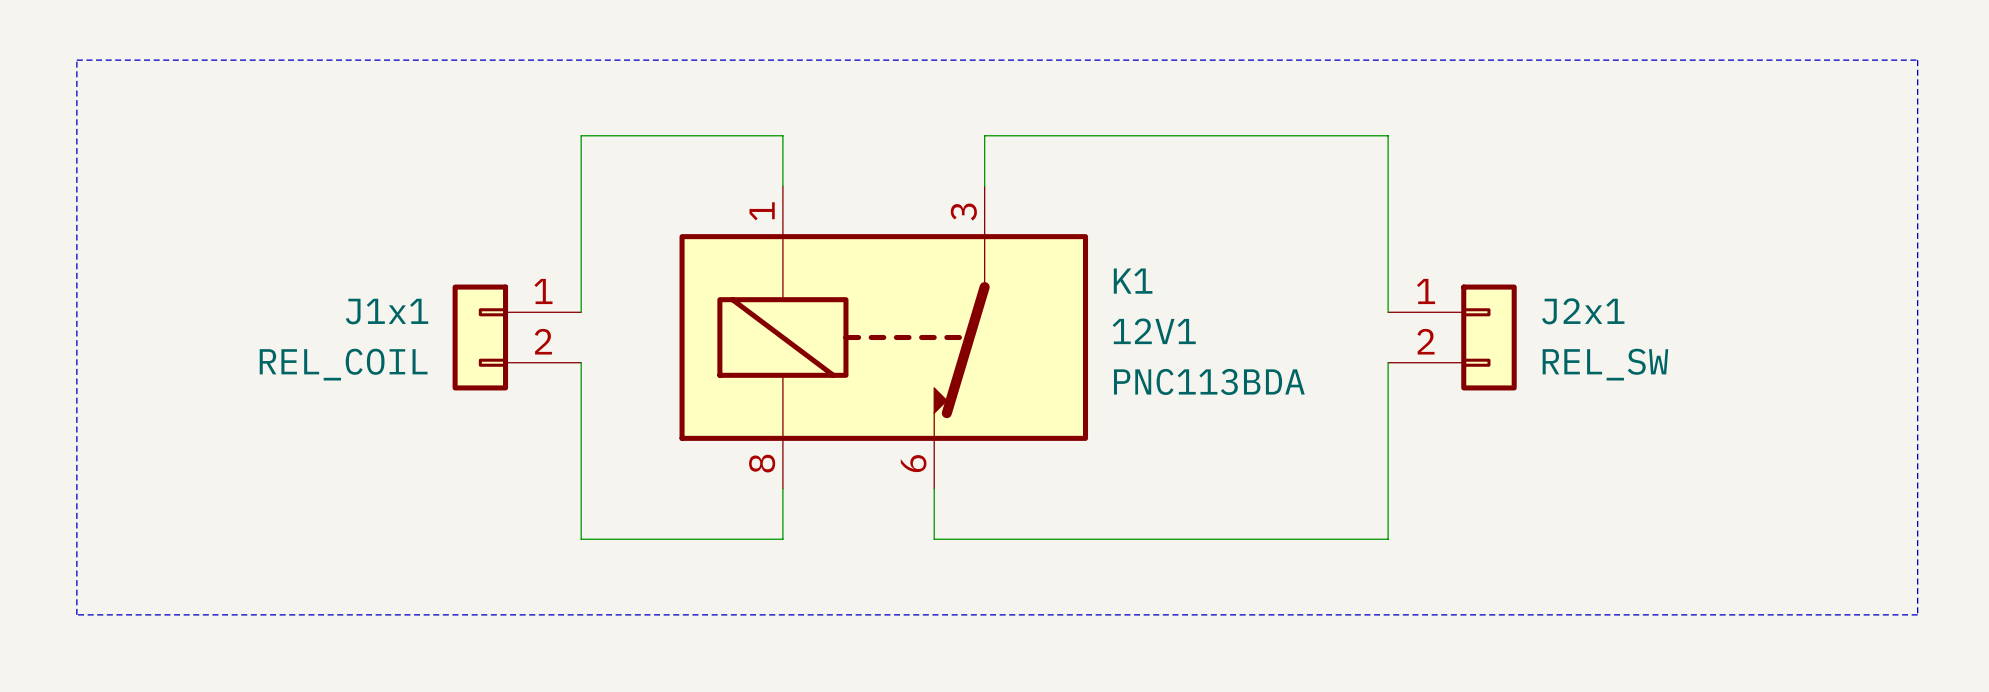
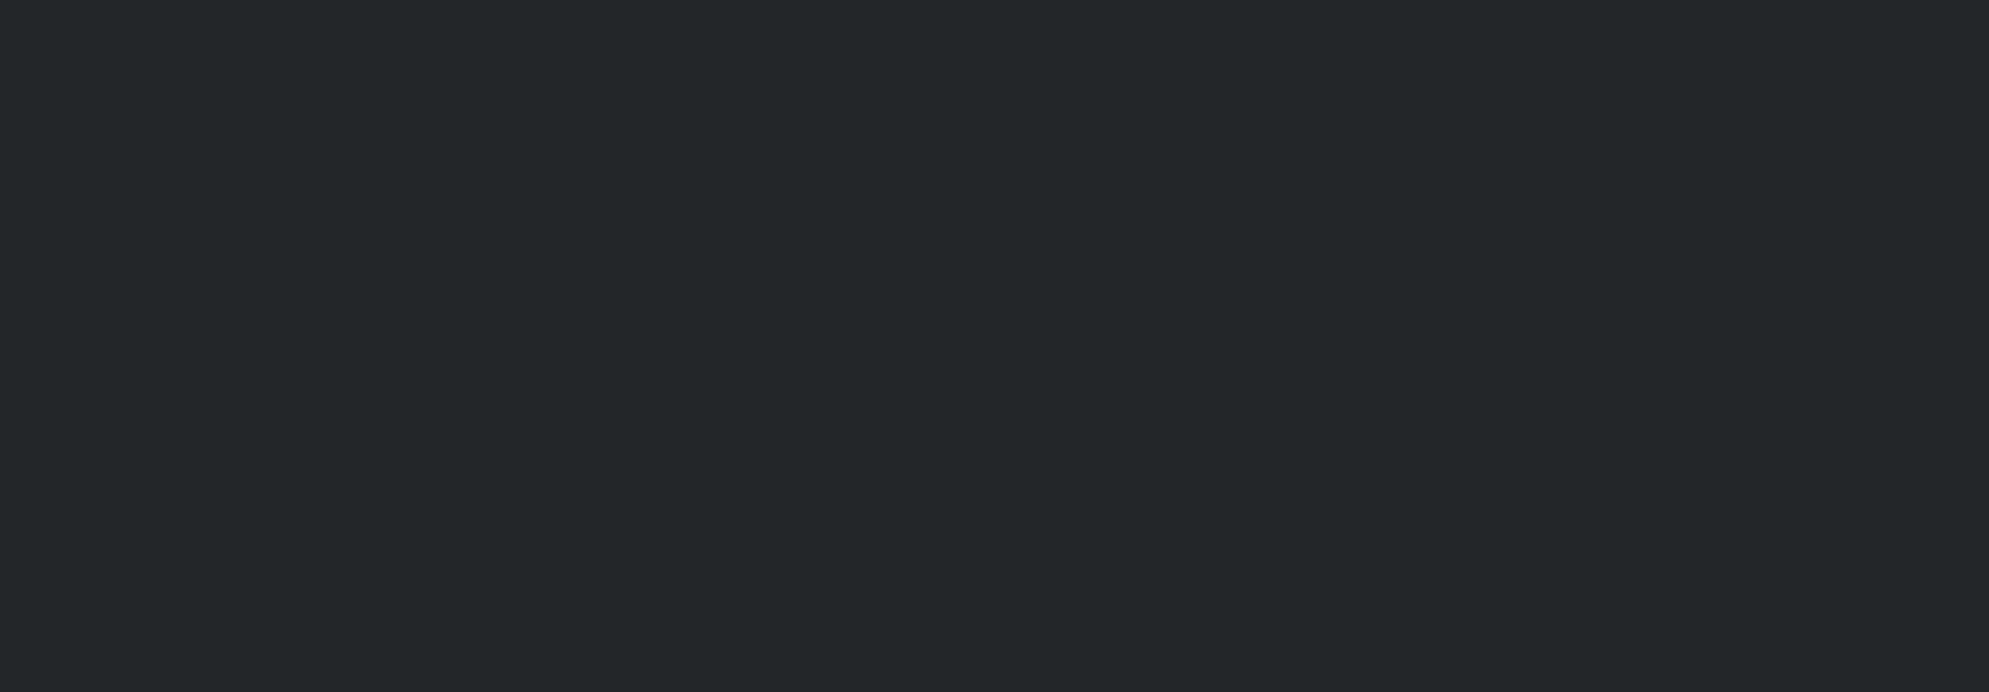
line: (76, 60) (1917, 60) (1917, 614) (76, 614) (76, 60) -> none
wire: (782, 186) (782, 135) (581, 135) (581, 312) -> none
wire: (984, 186) (984, 135) (1388, 135) (1388, 312) -> none
J1x1: REL_COIL (516, 337) -> none
12V1: K1 (883, 337) -> none
J2x1: REL_SW (1452, 337) -> none
wire: (581, 362) (581, 539) (782, 539) (782, 488) -> none
wire: (1388, 362) (1388, 539) (934, 539) (934, 488) -> none

